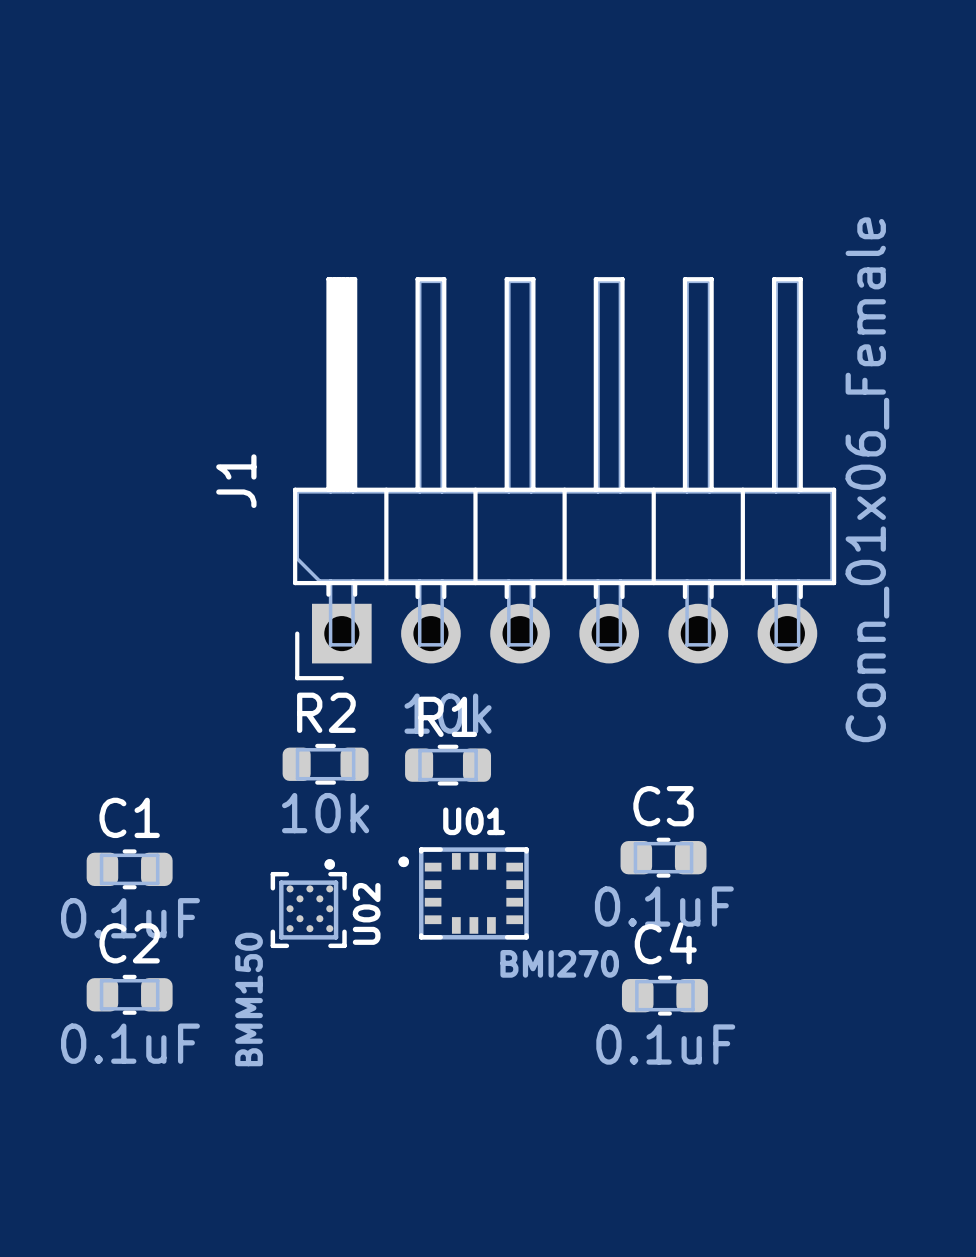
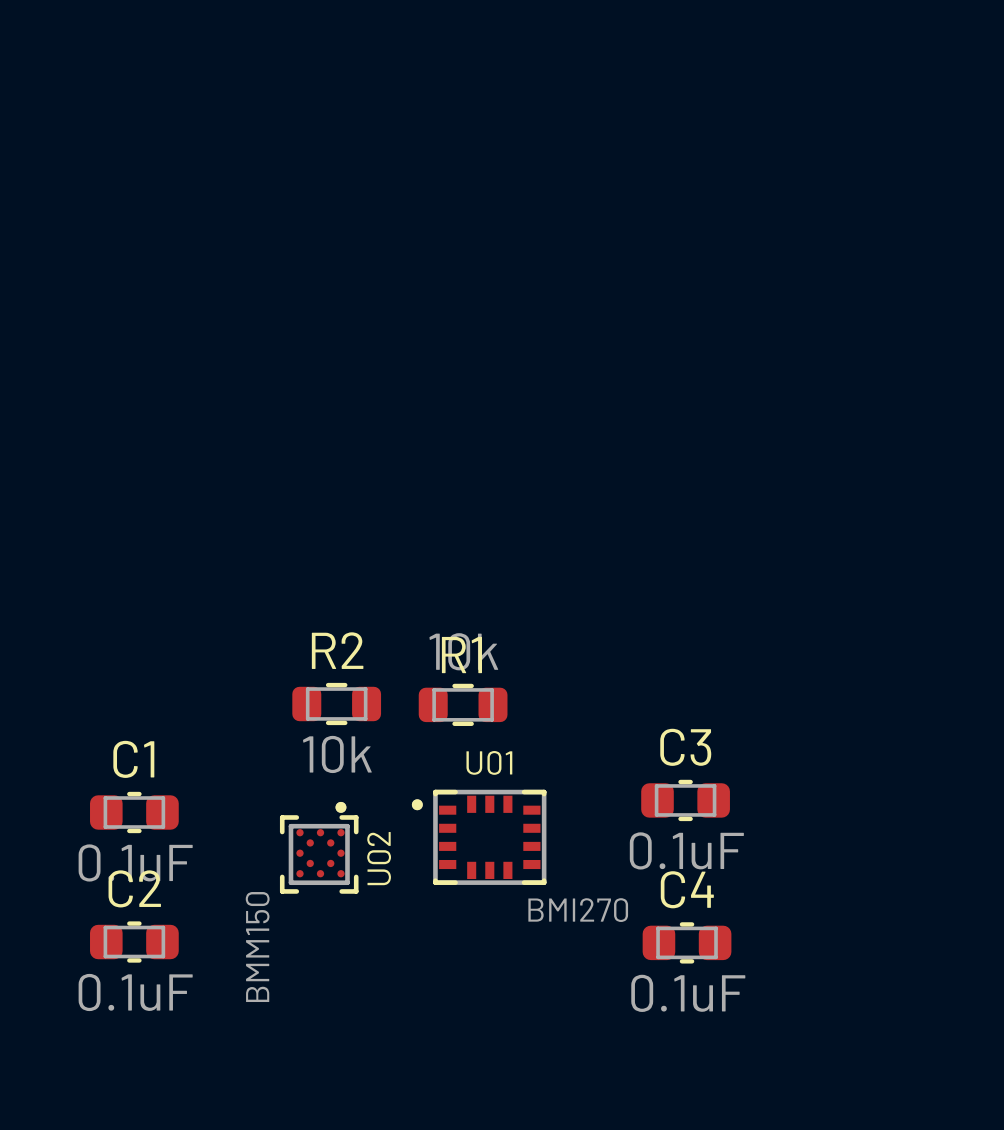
J1: Conn_01x06_Female (564, 478) -> none

